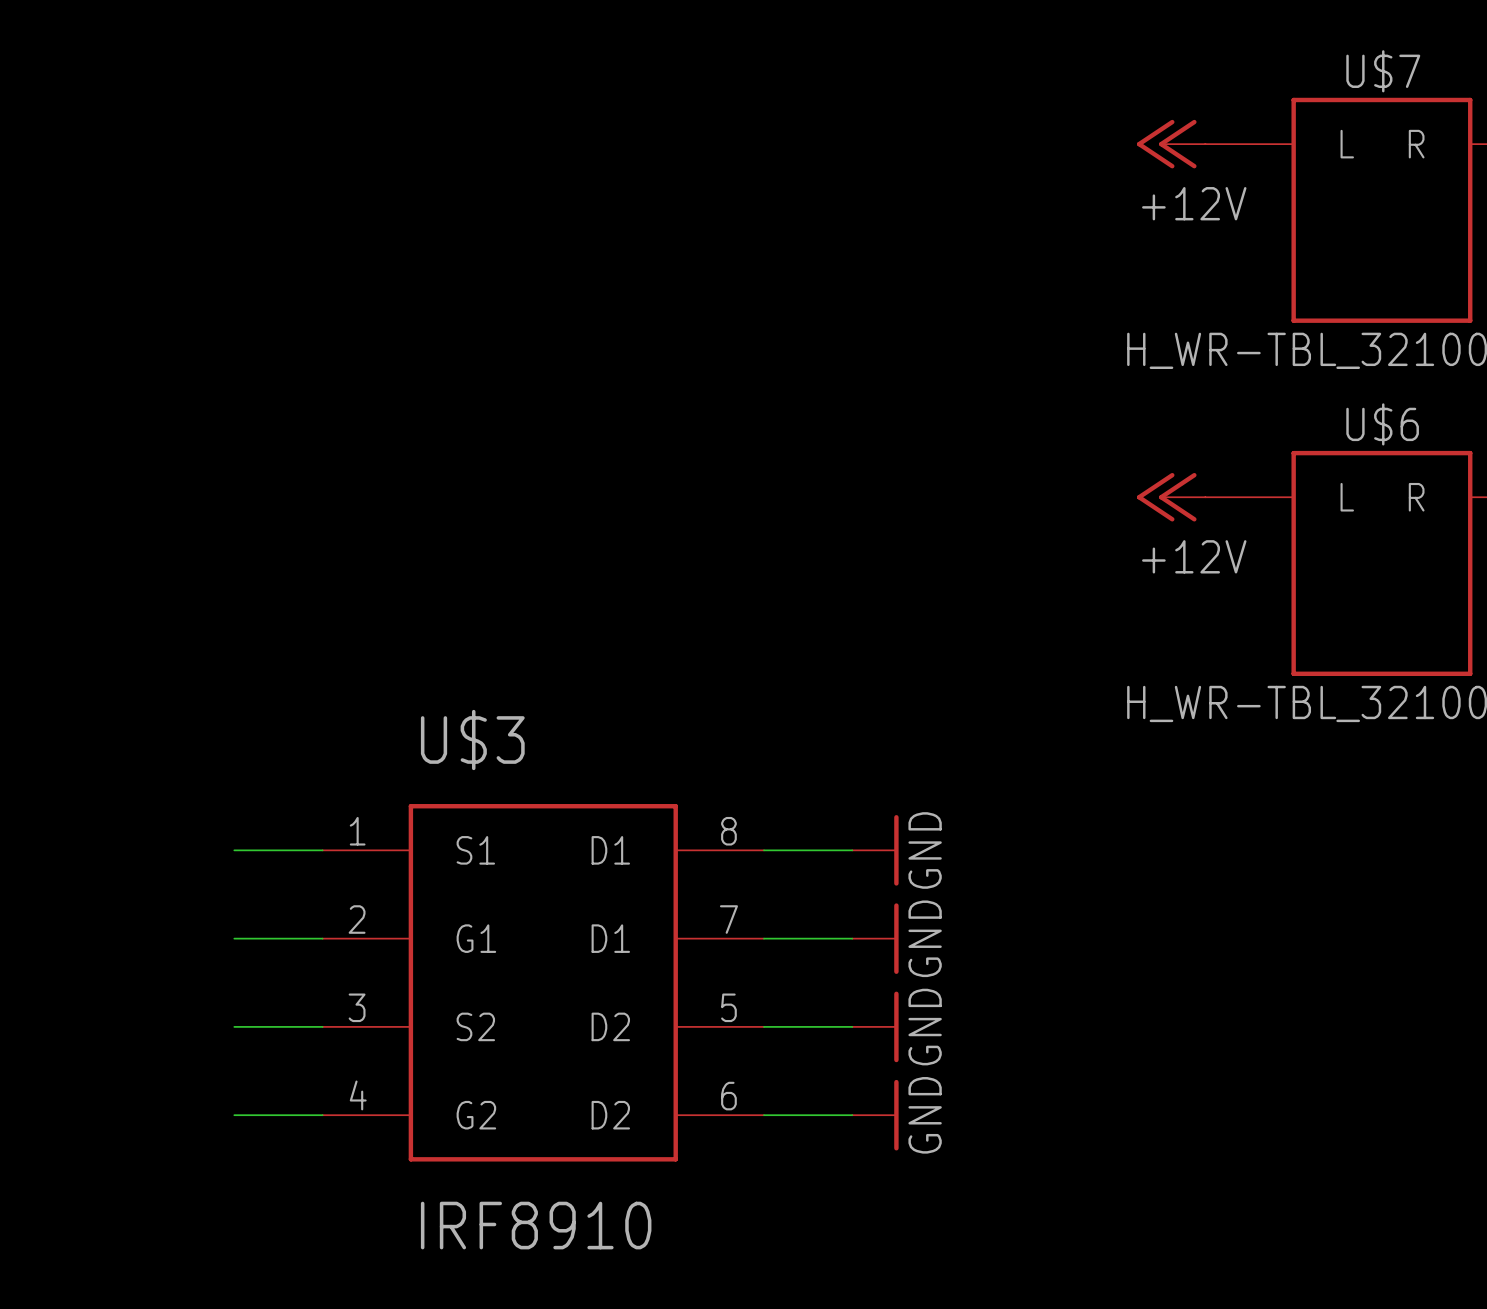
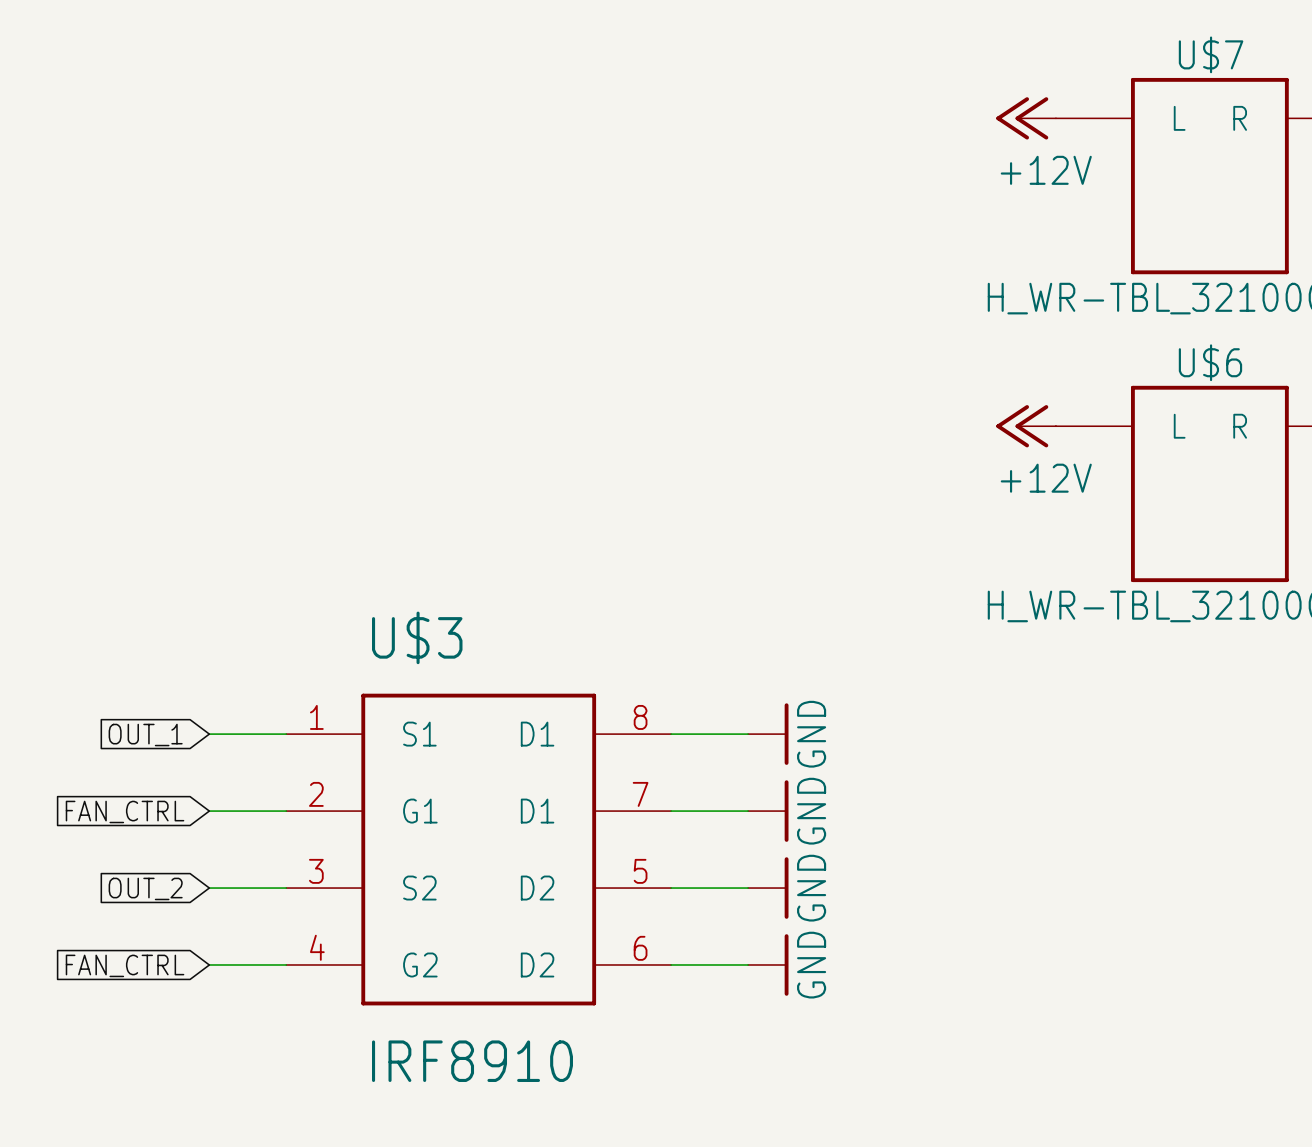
global label: none -> OUT_1 (145, 735)
global label: none -> FAN_CTRL (125, 811)
global label: none -> OUT_2 (145, 888)
global label: none -> FAN_CTRL (125, 965)

